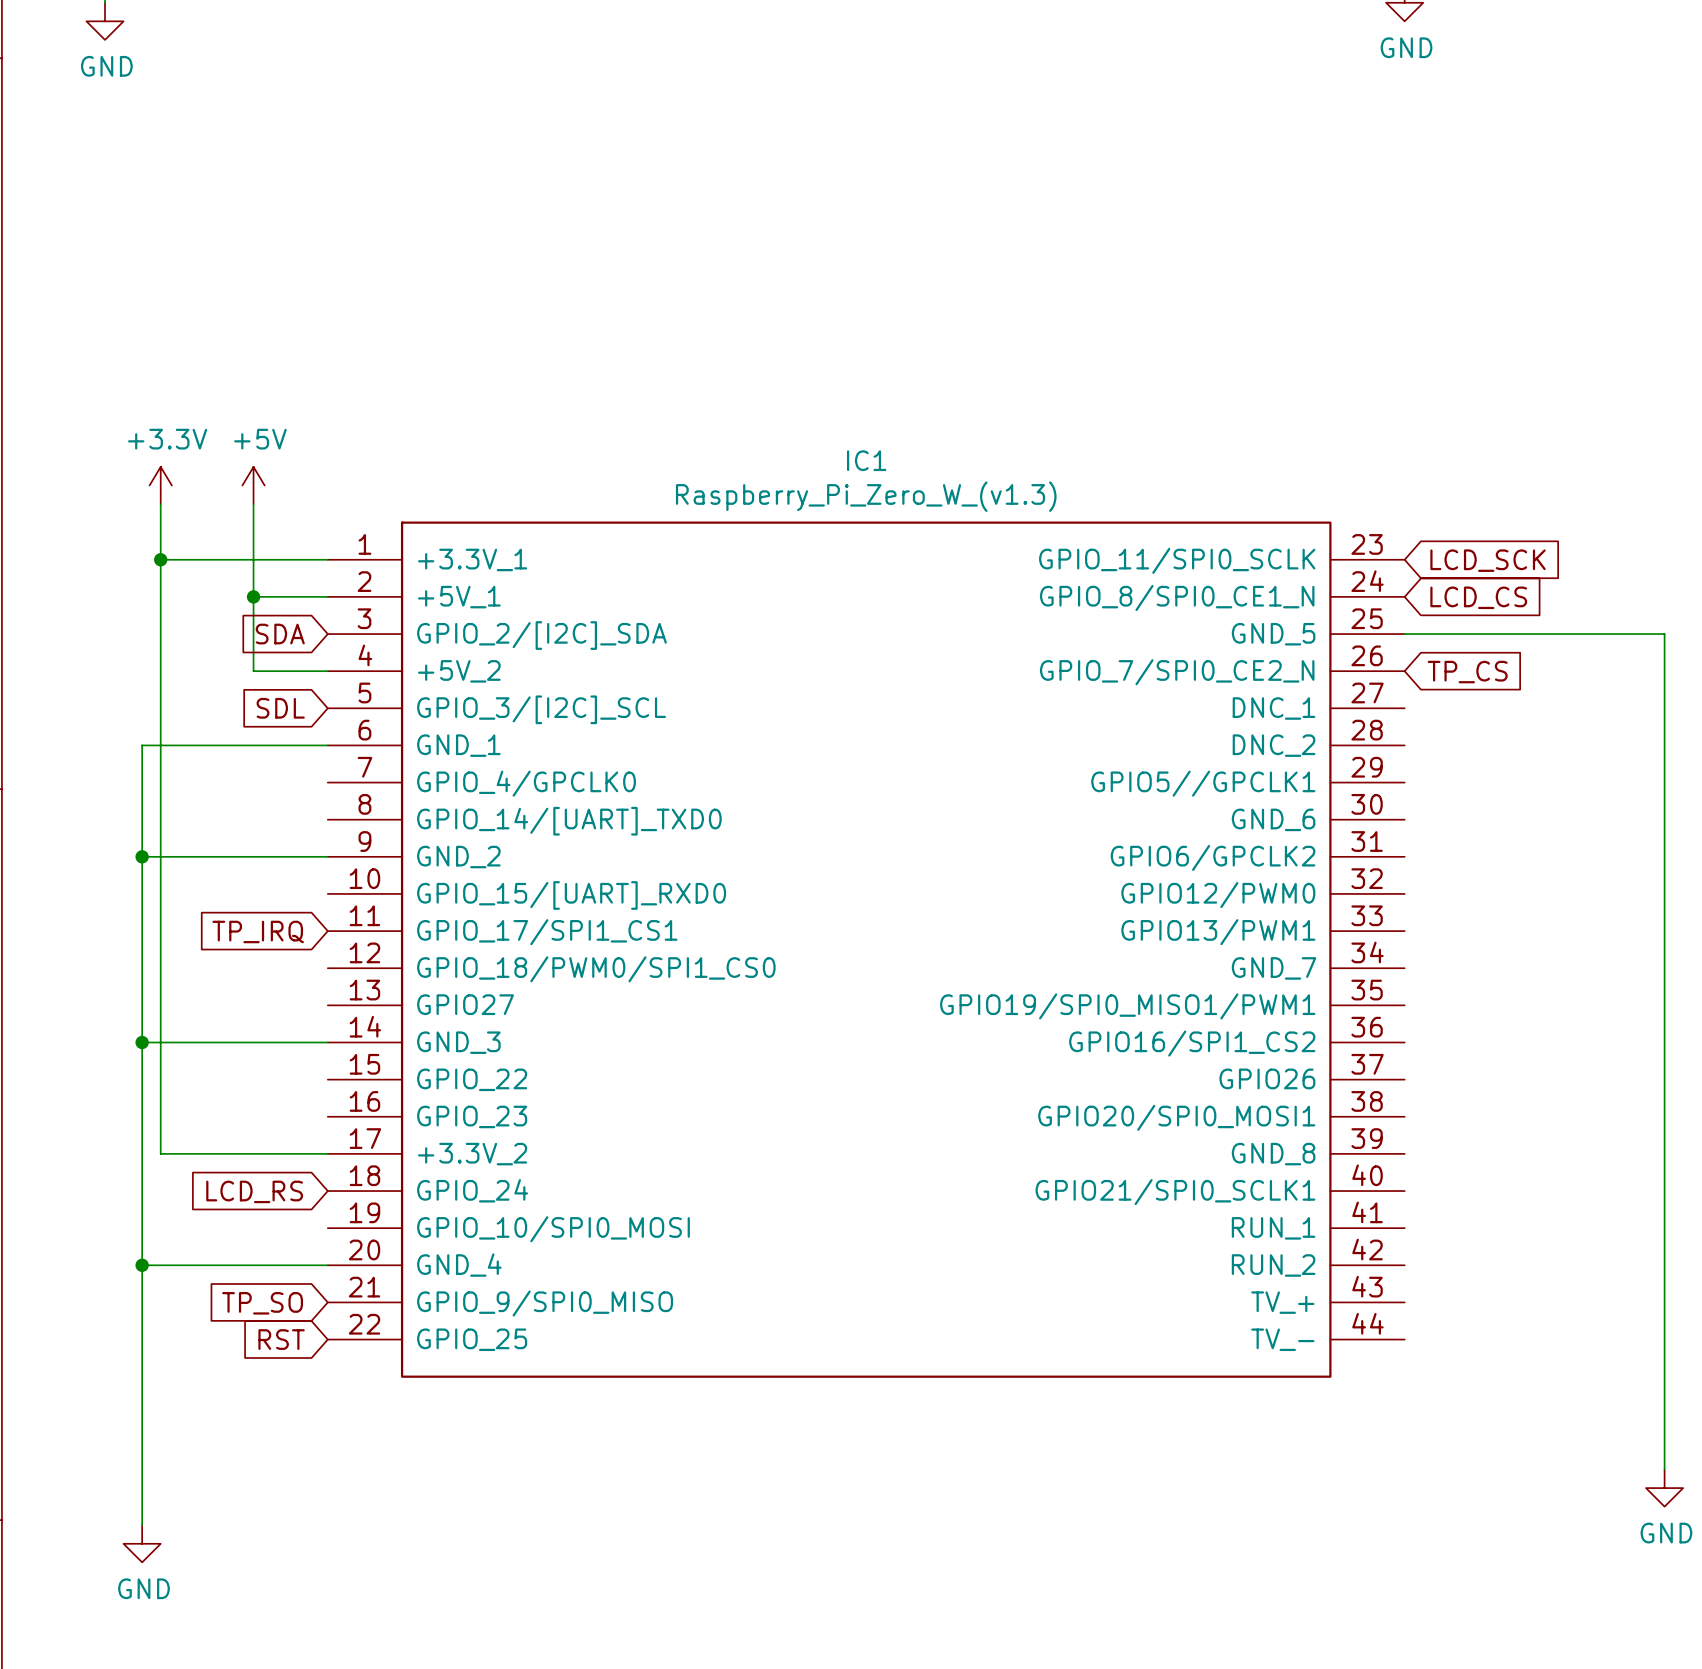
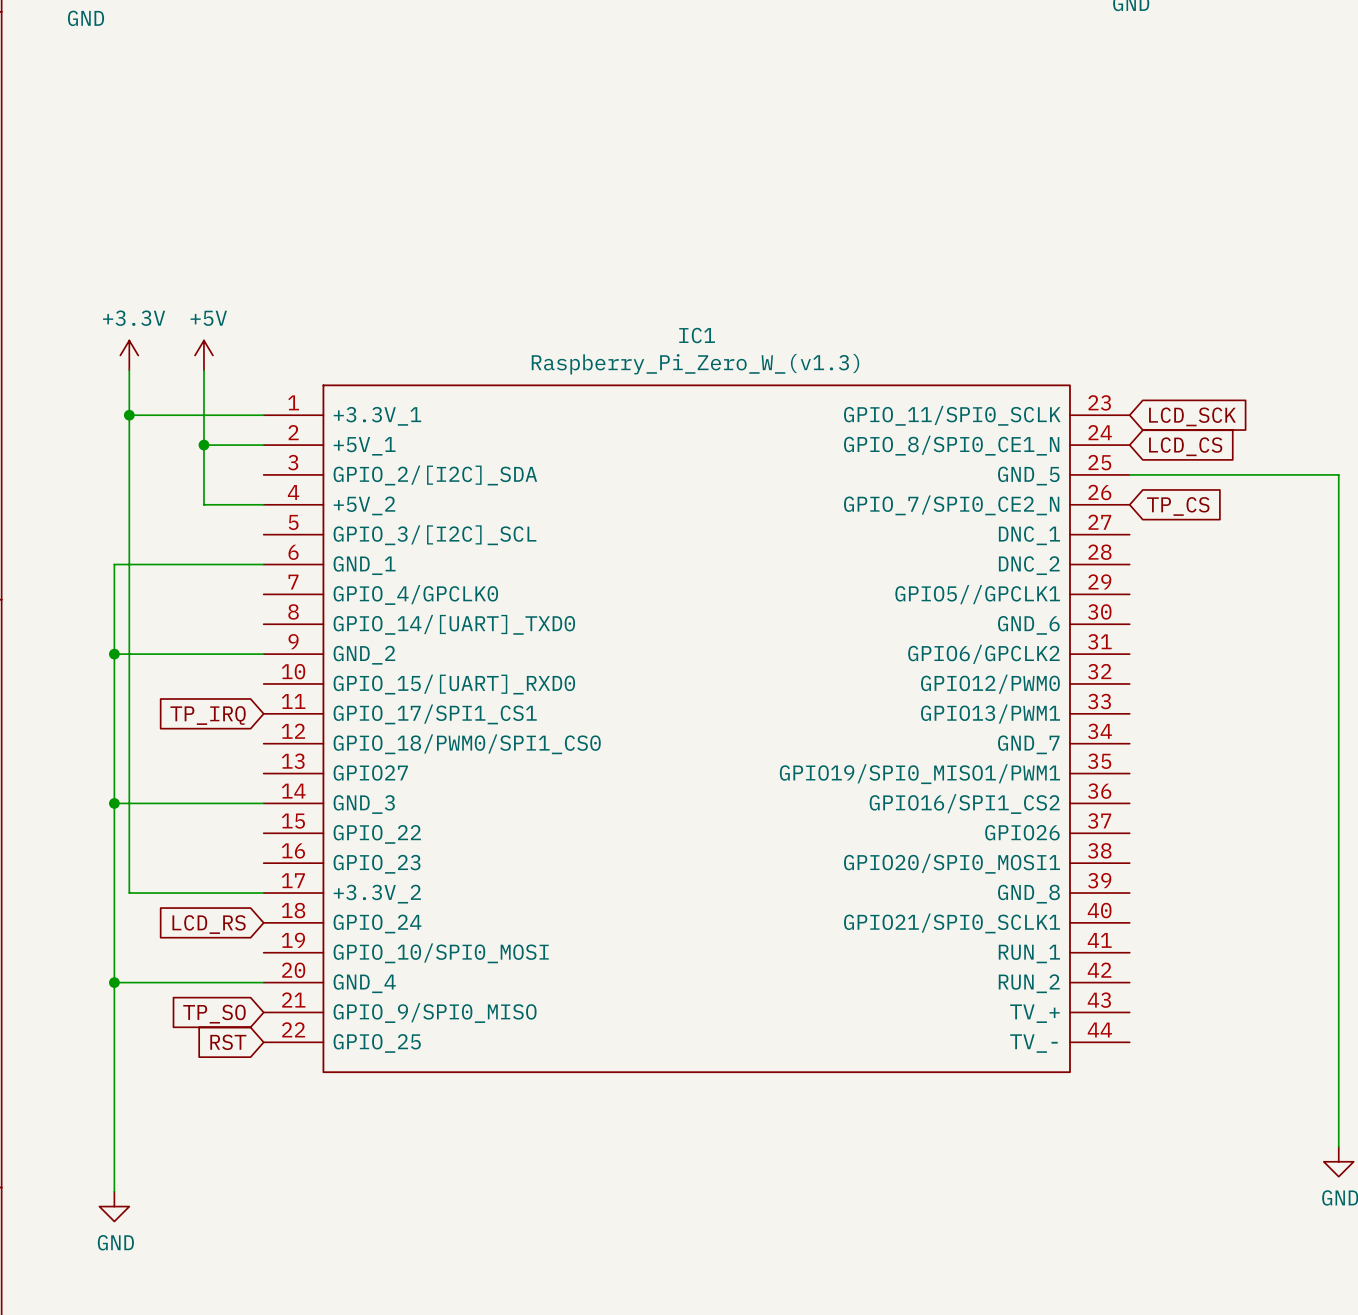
global label: SDA (280, 634) -> none
global label: SDL (280, 708) -> none

